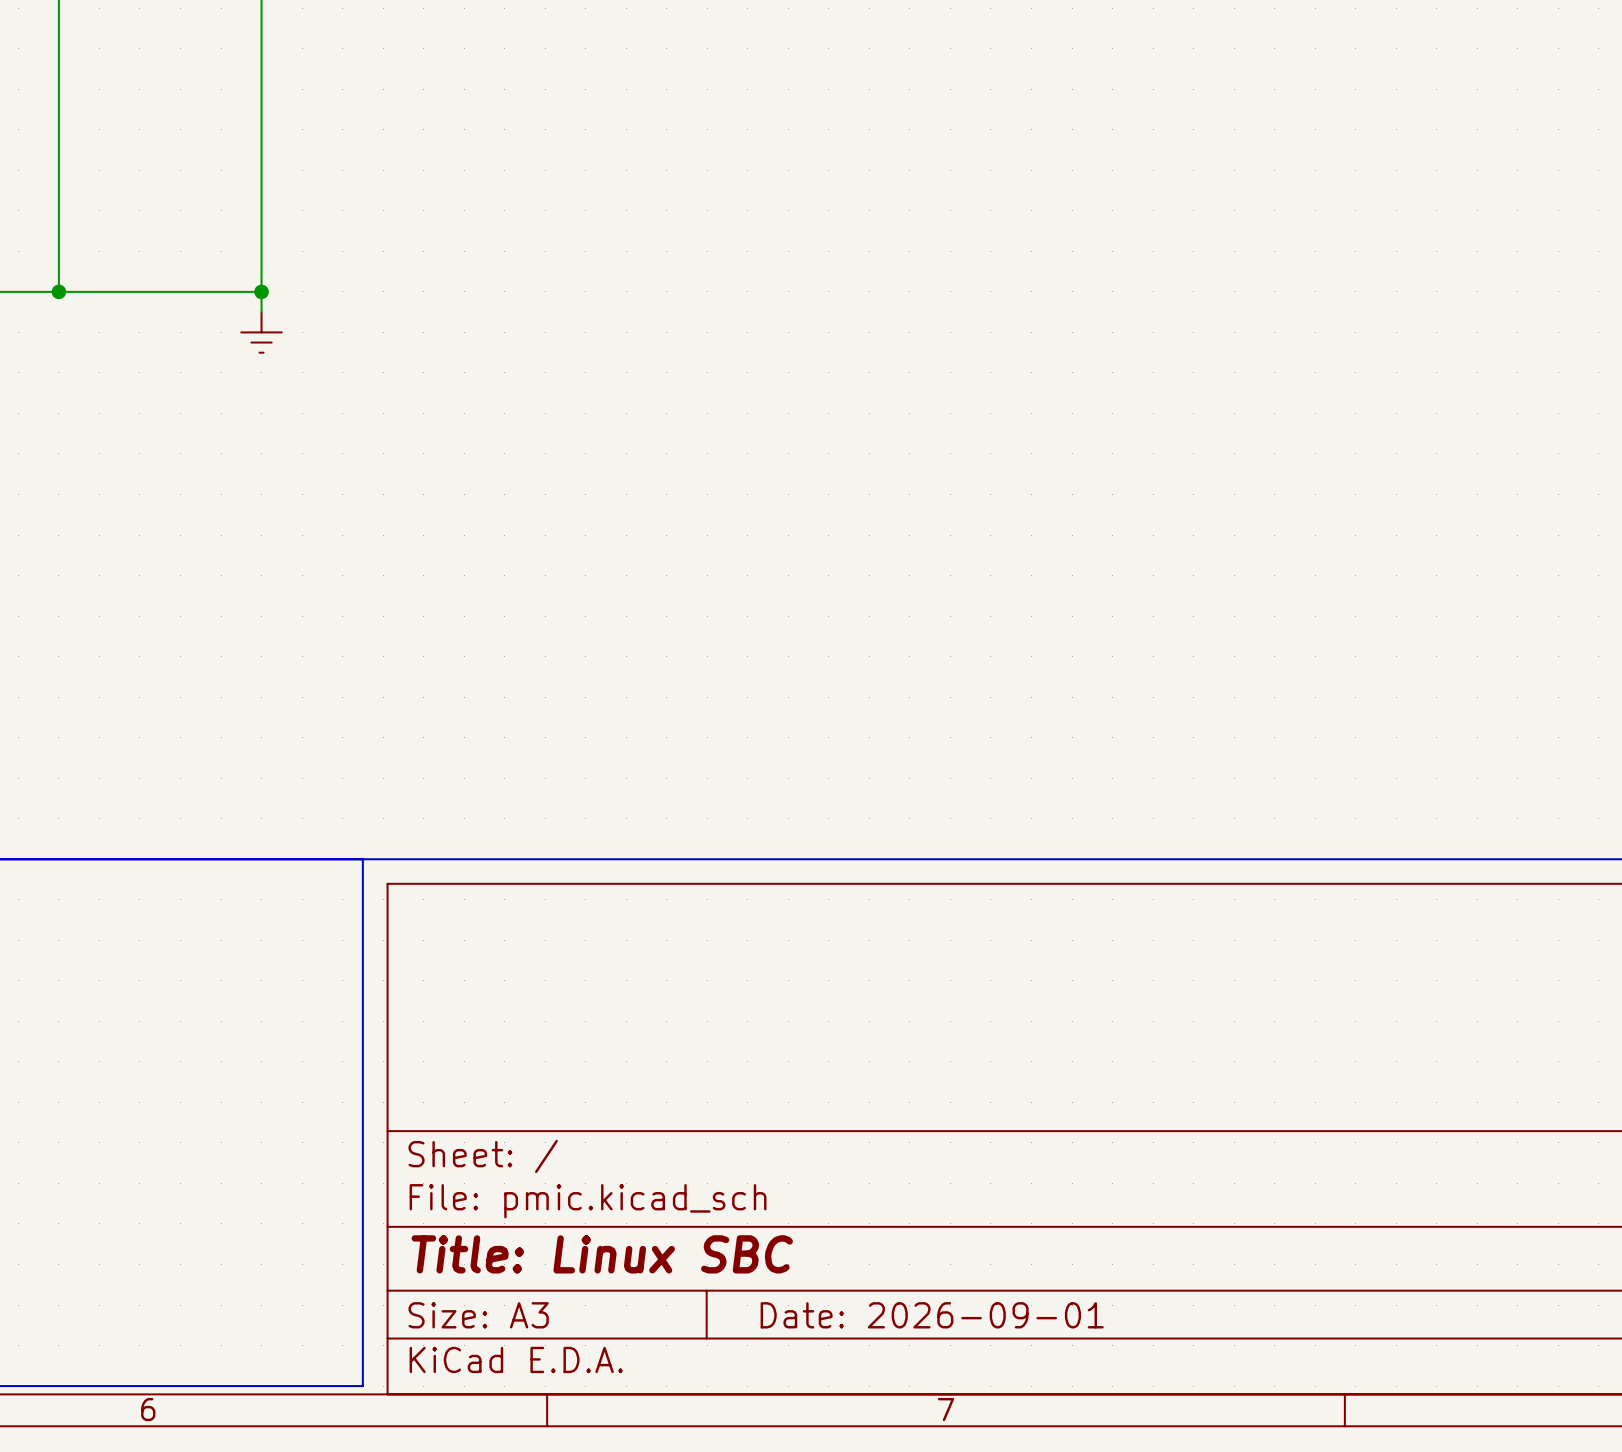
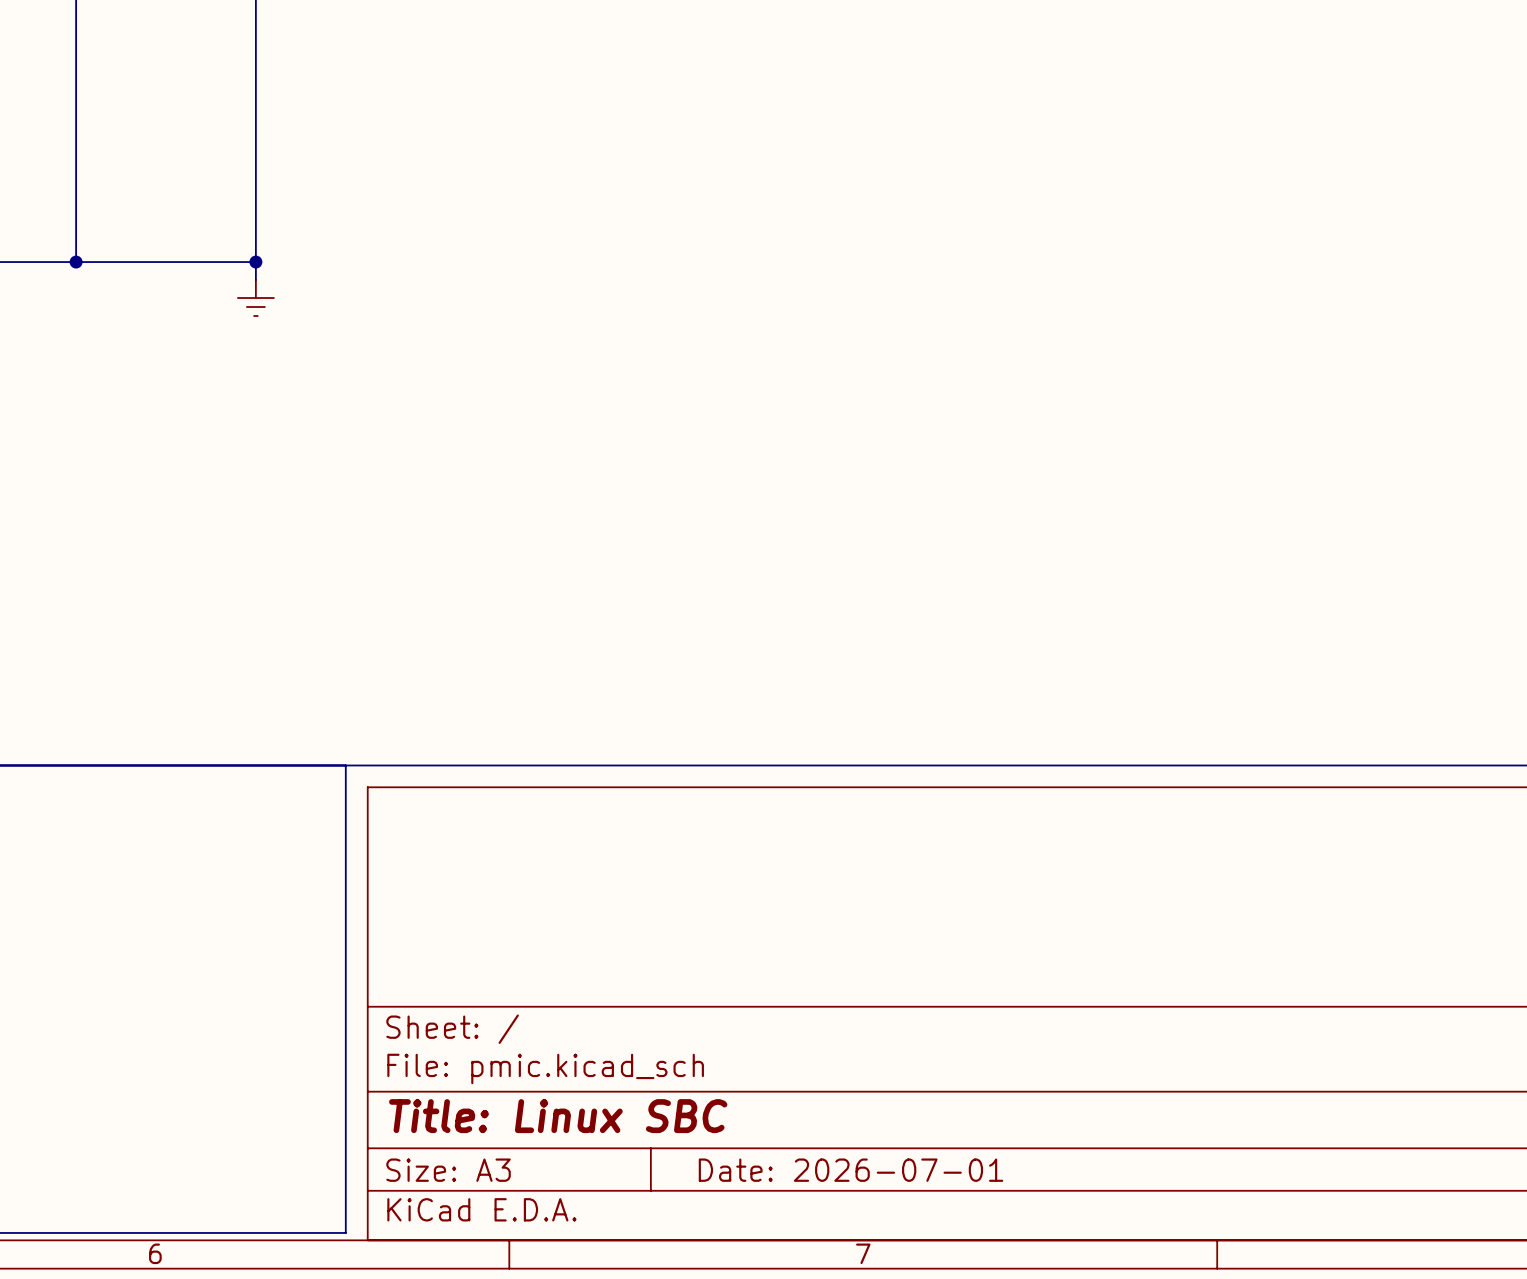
title block: Date: 2026-09-01 (932, 1315) -> Date: 2026-07-01 (851, 1170)

